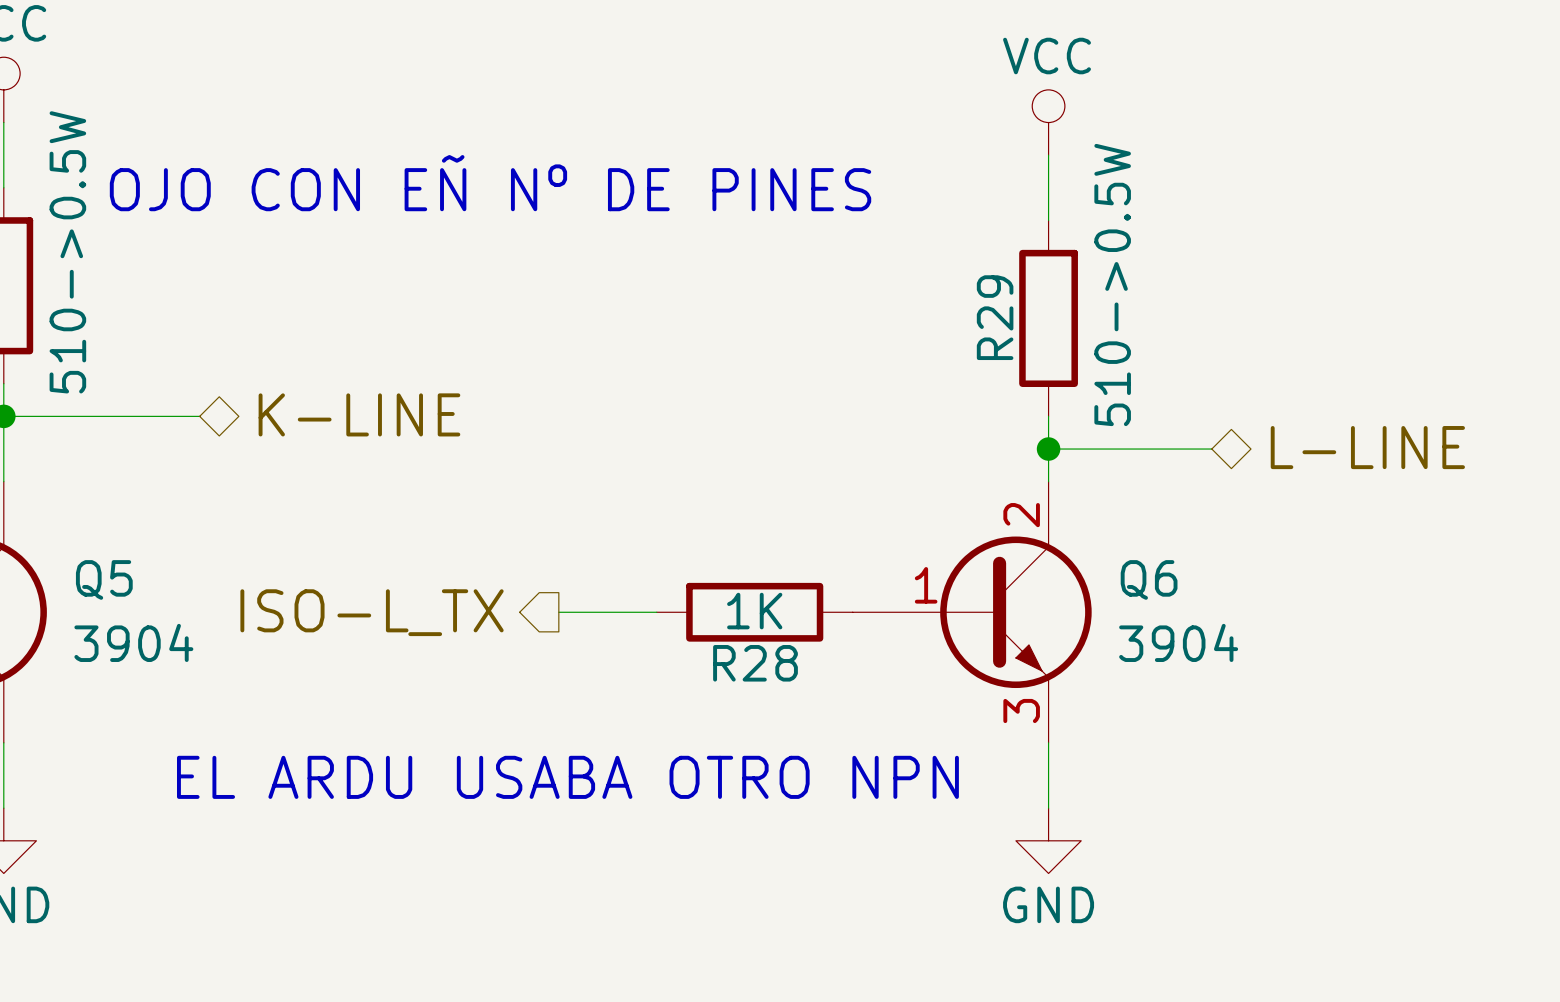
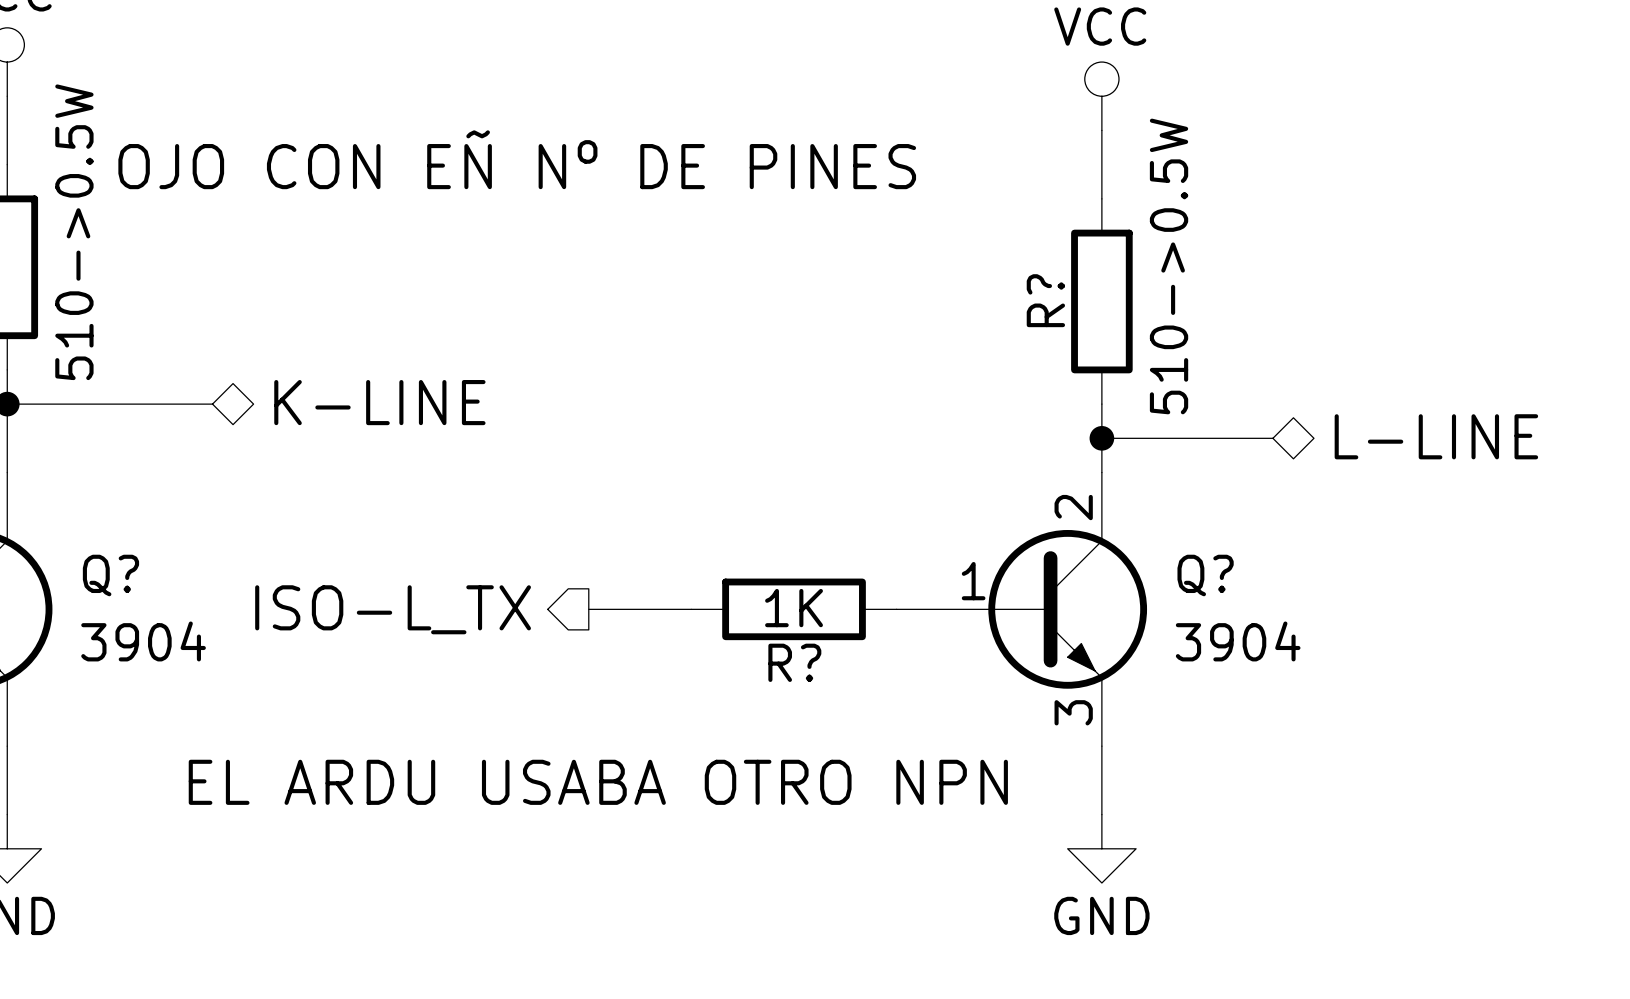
R29 name: R29 (995, 317) -> R? (1045, 300)
Q5 name: Q5 (104, 579) -> Q? (110, 575)
Q6 name: Q6 (1149, 579) -> Q? (1205, 575)
R28 name: R28 (755, 663) -> R? (794, 662)

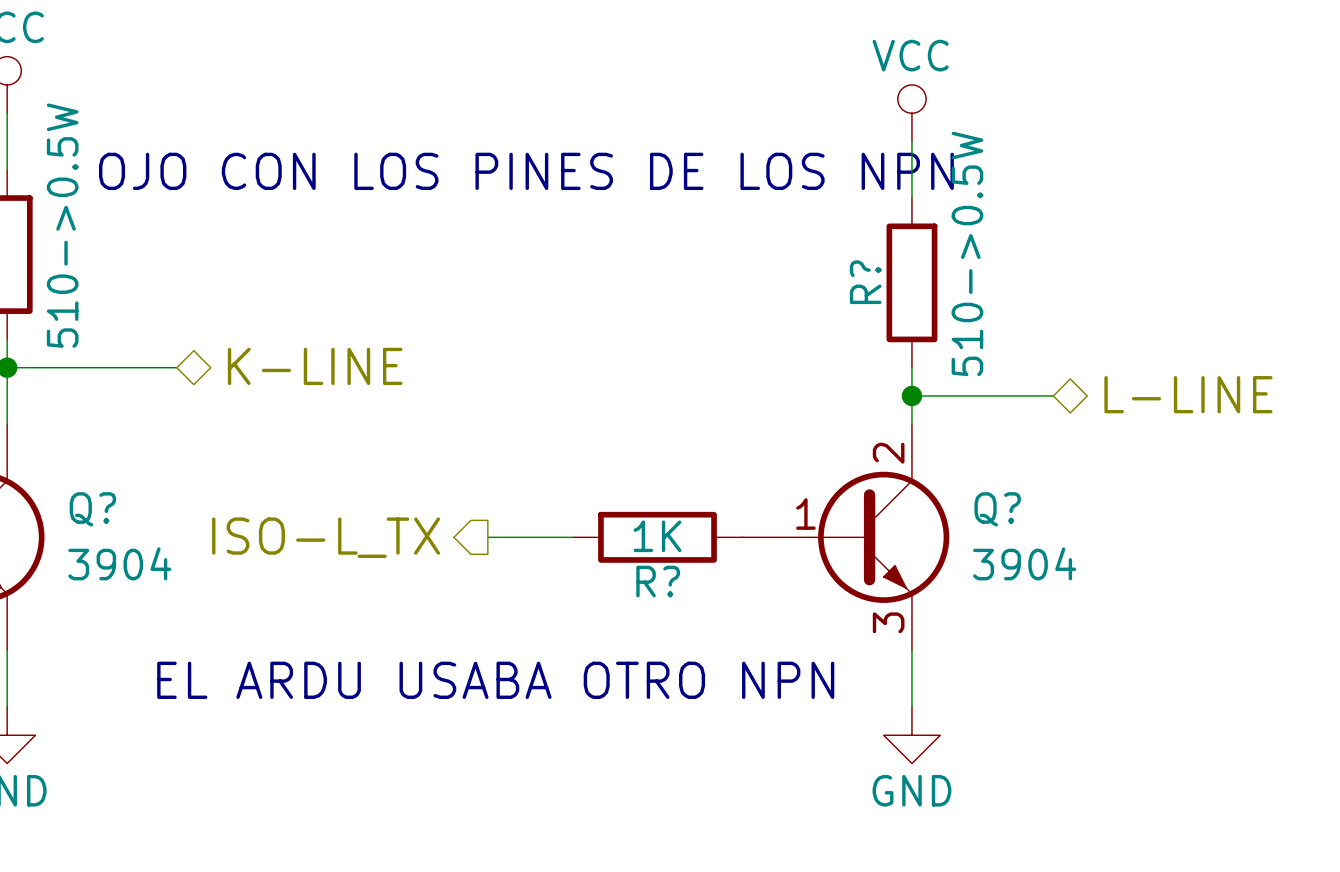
text: OJO CON EÑ Nº DE PINES (517, 159) -> OJO CON LOS PINES DE LOS NPN (526, 171)

